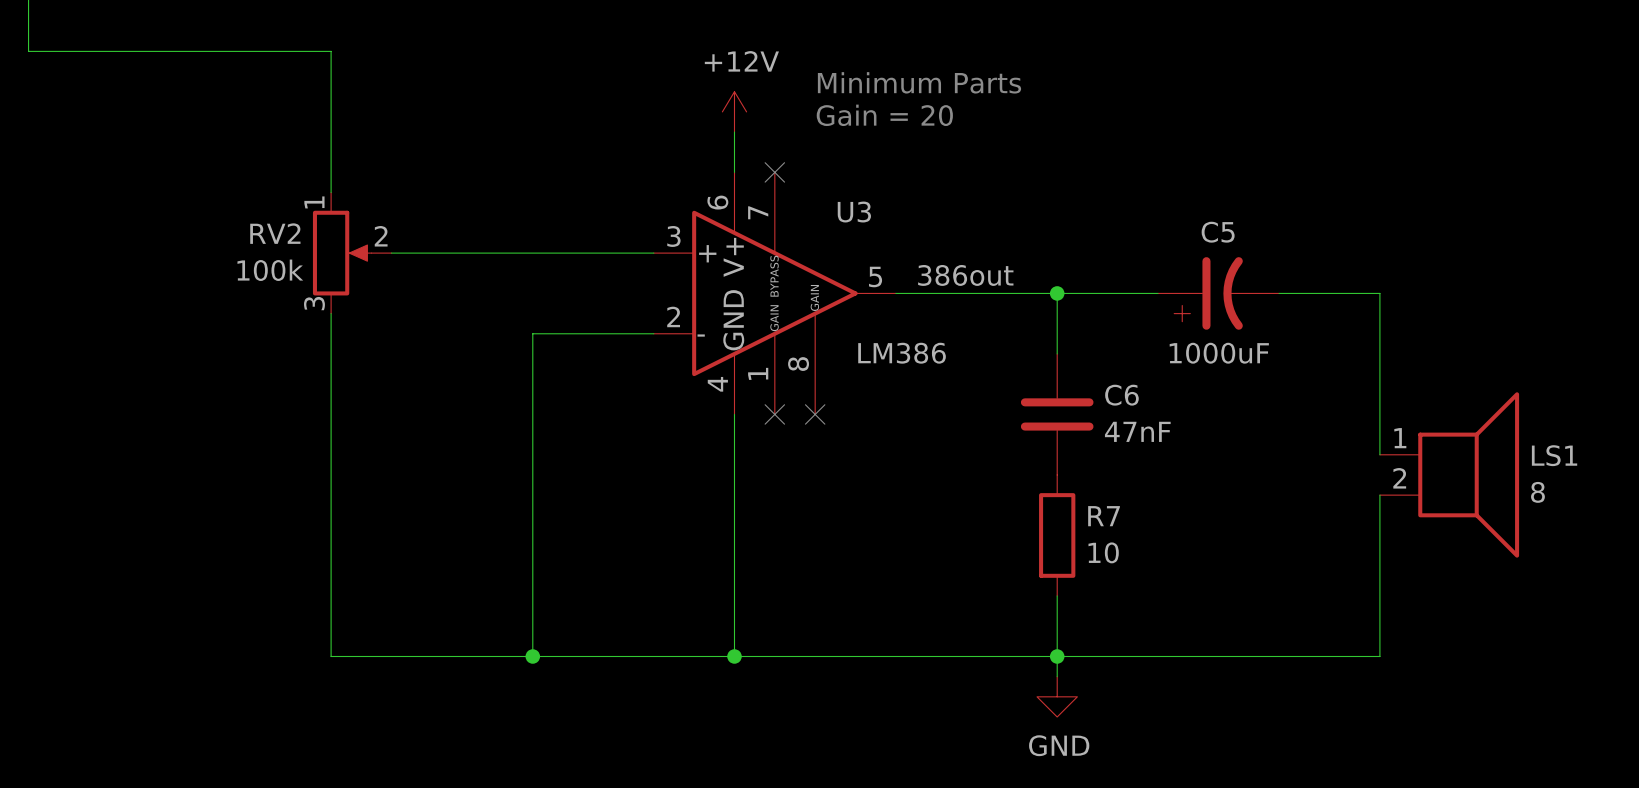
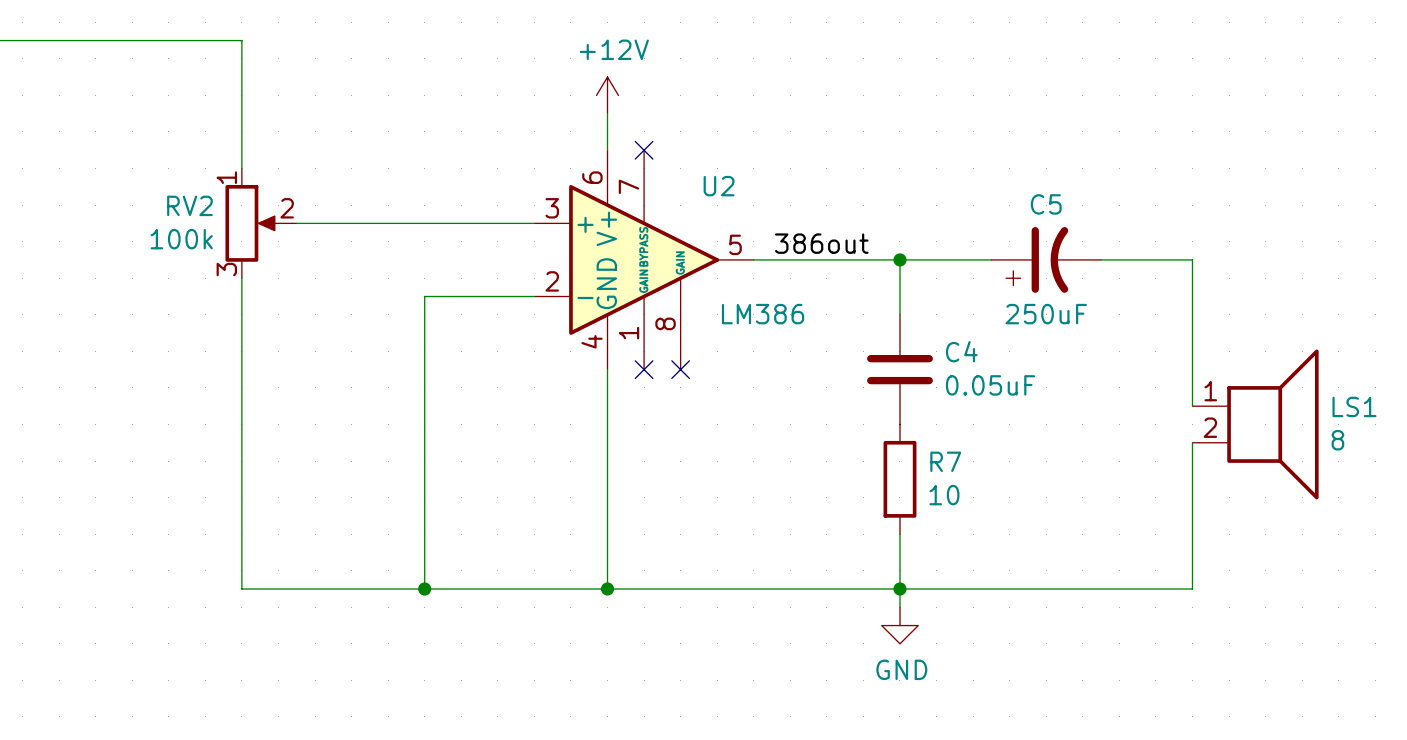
text: Minimum Parts (919, 82) -> none
text: Gain = 20 (884, 115) -> none
U3 name: U3 (854, 212) -> U2 (719, 186)
C5 value: 1000uF (1219, 353) -> 250uF (1046, 314)
C6 name: C6 (1121, 395) -> C4 (961, 351)
C6 value: 47nF (1137, 431) -> 0.05uF (990, 385)

